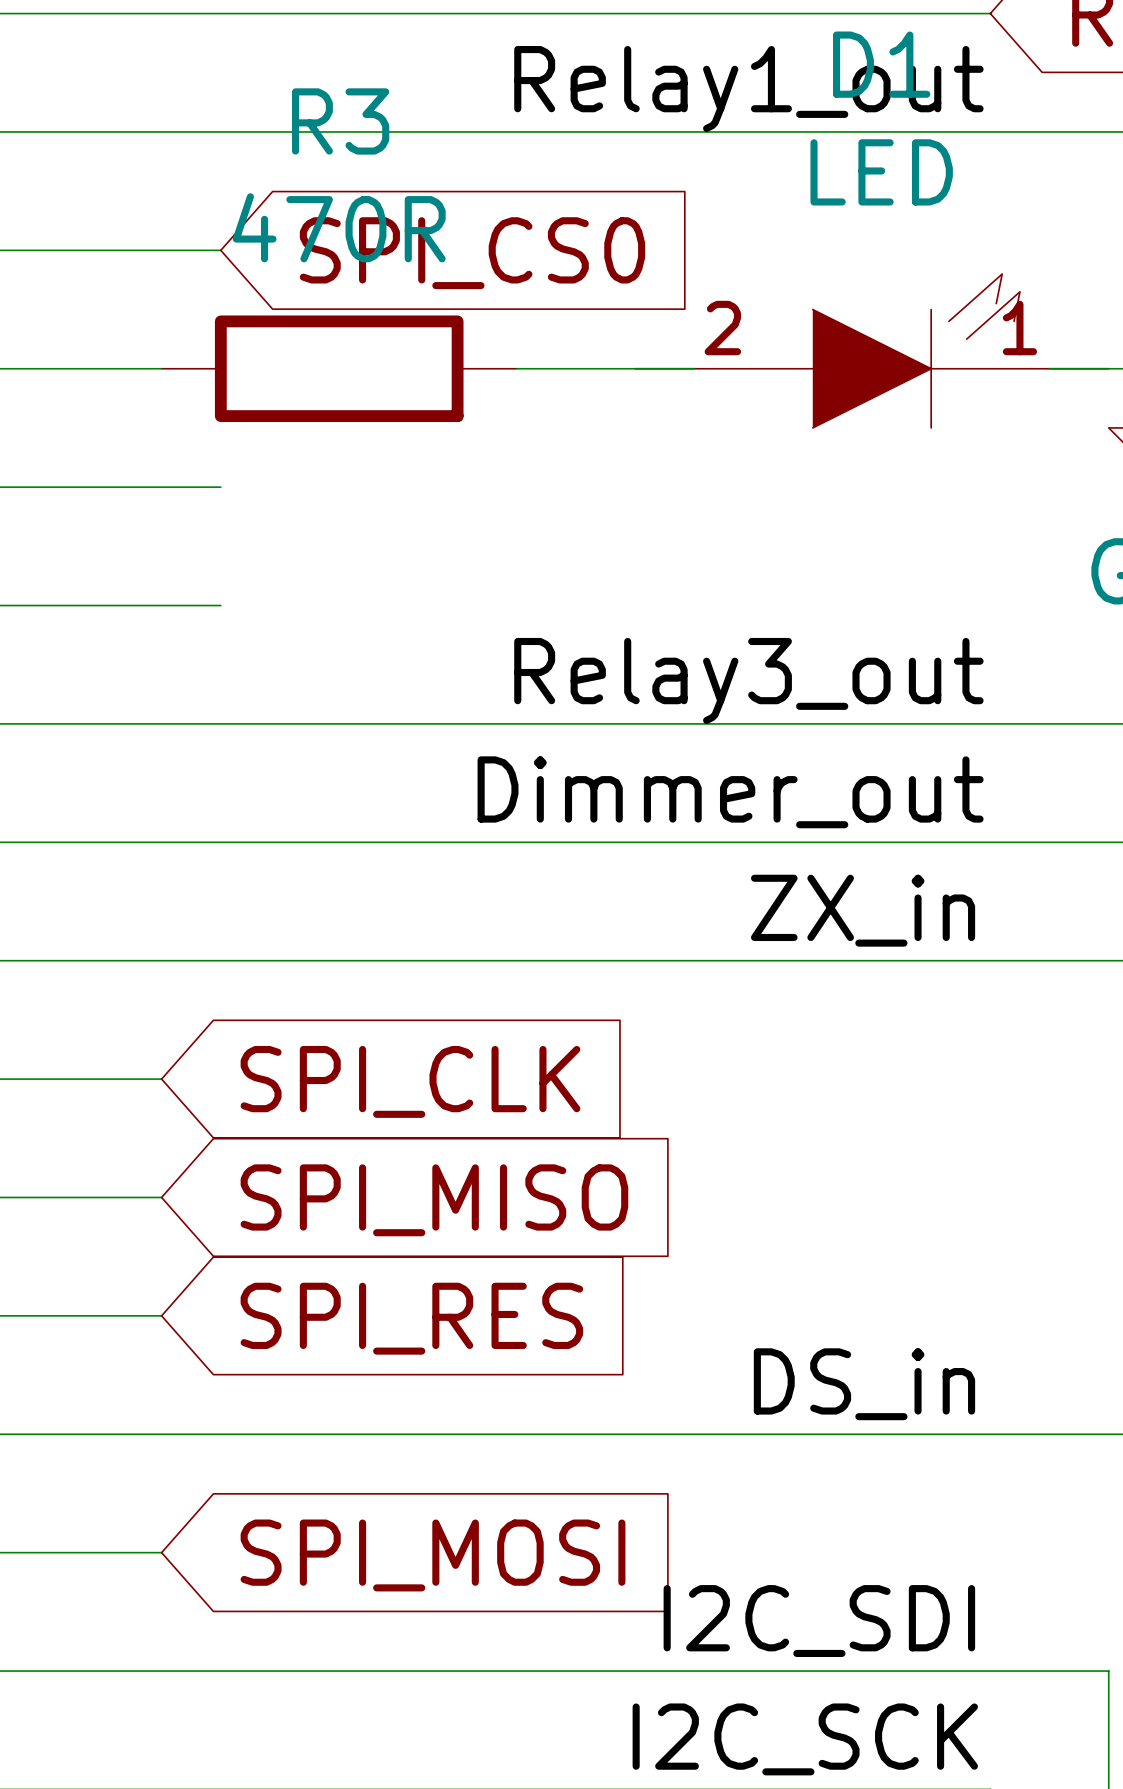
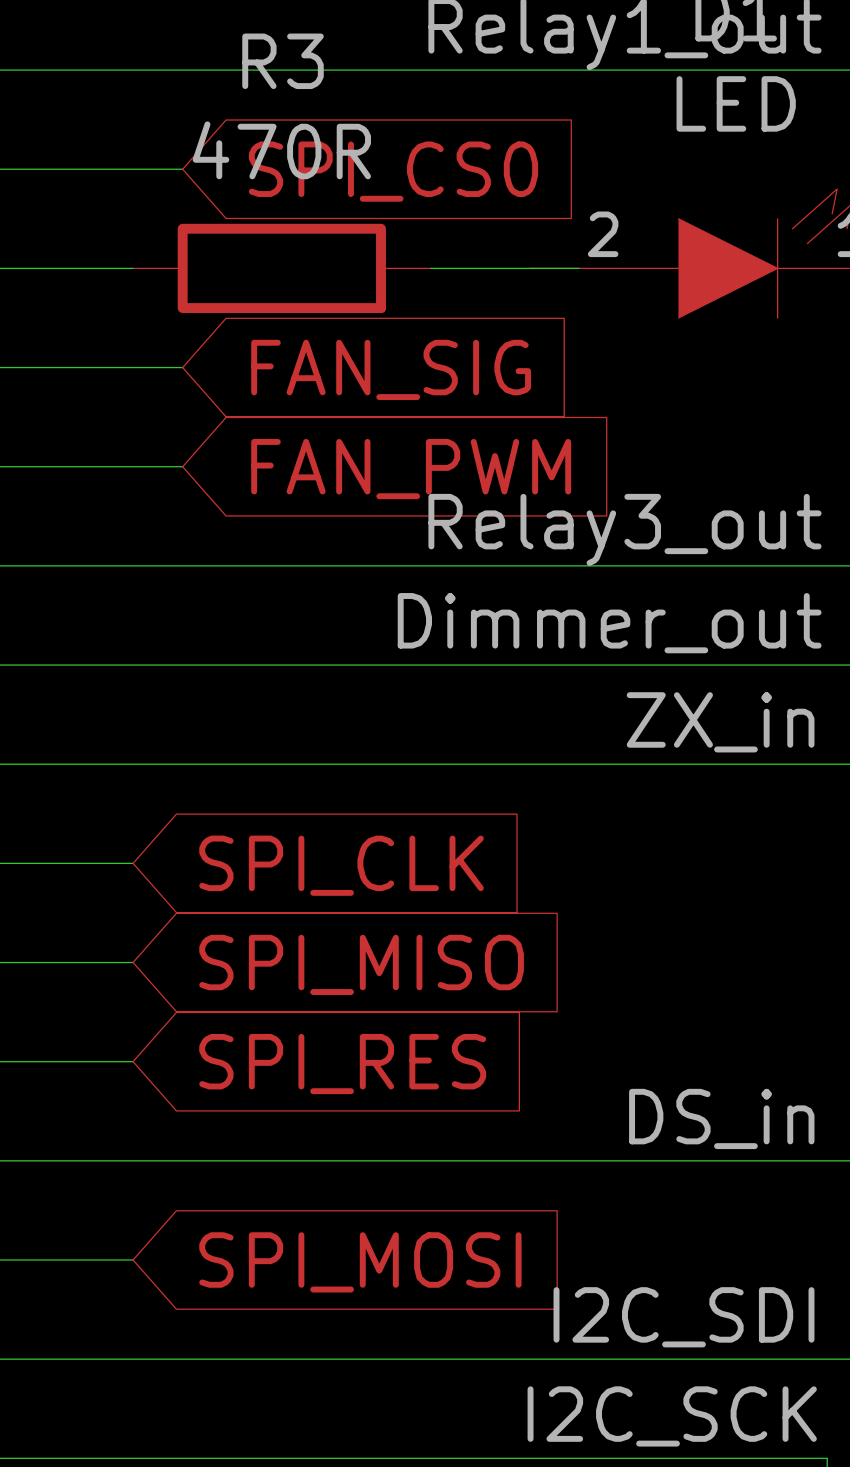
global label: none -> FAN_SIG (391, 369)
global label: none -> FAN_PWM (411, 469)

